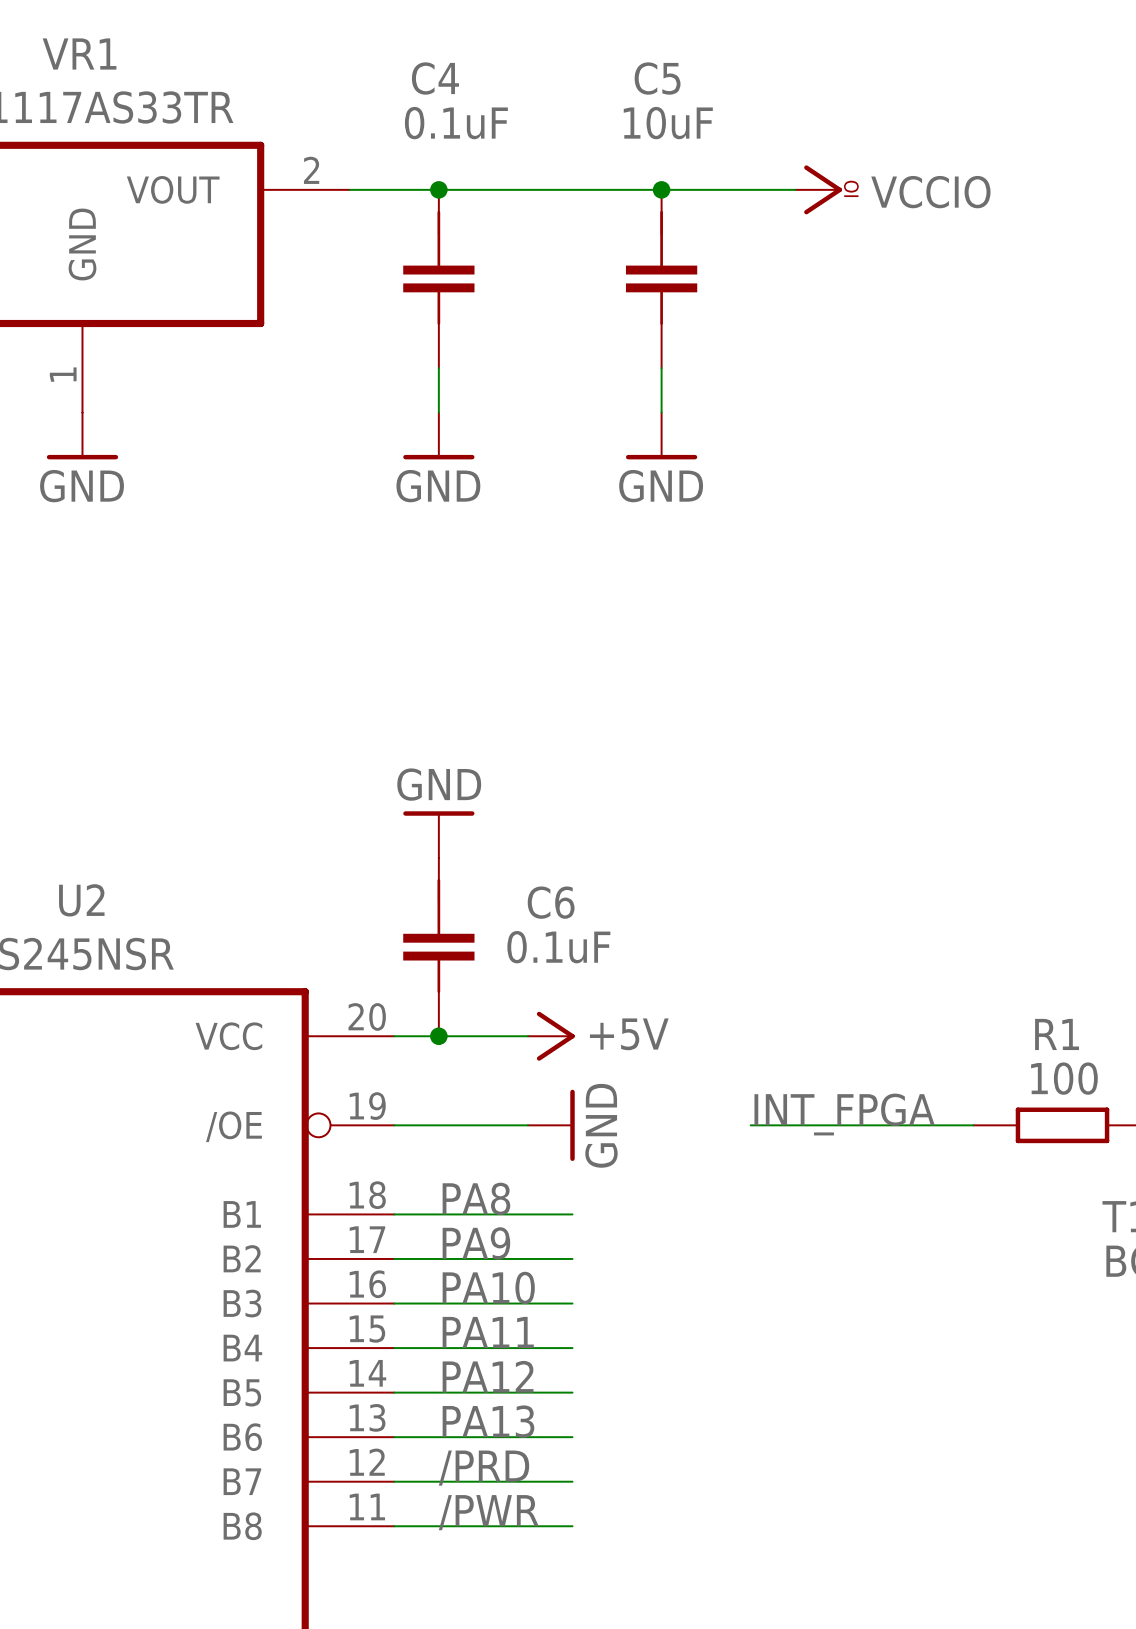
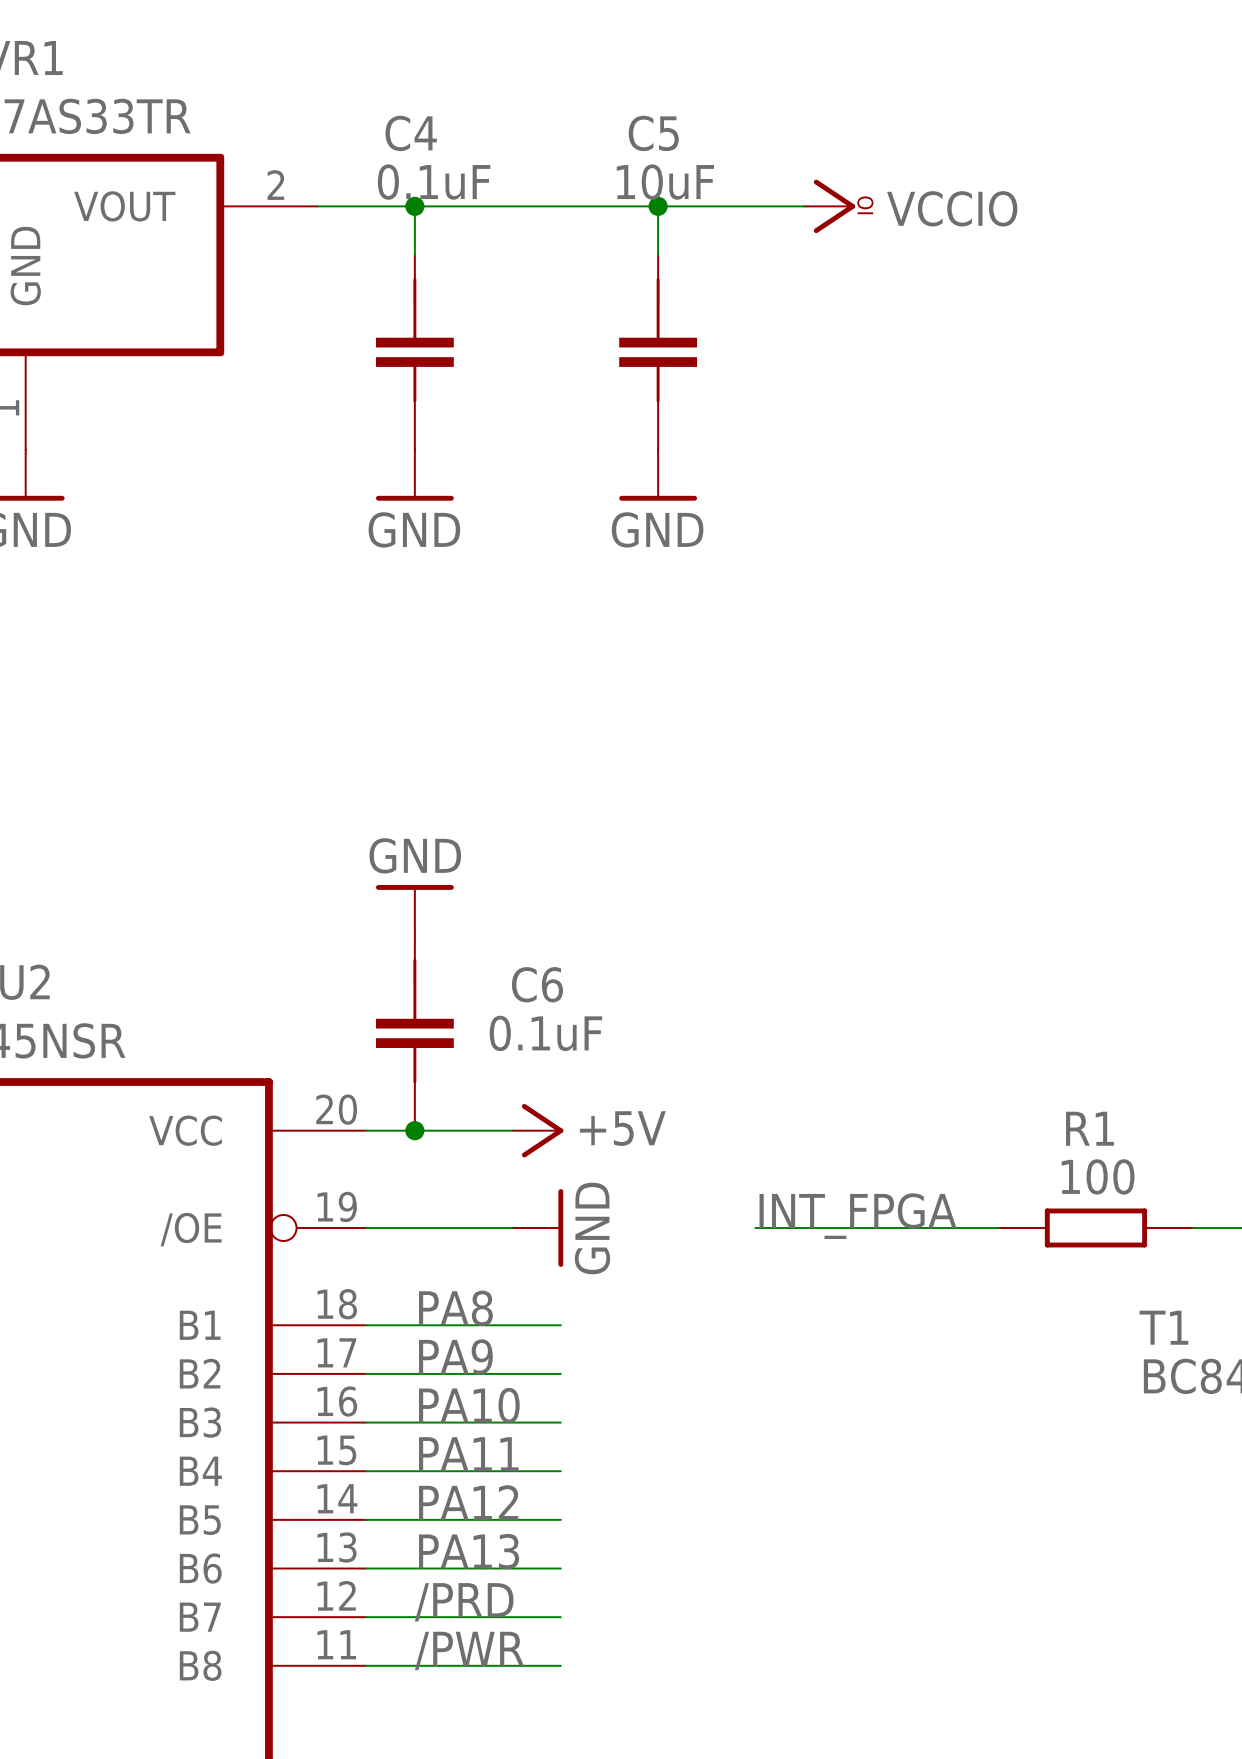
C4 position: (438, 278) -> (414, 352)
C5 position: (661, 278) -> (658, 352)

